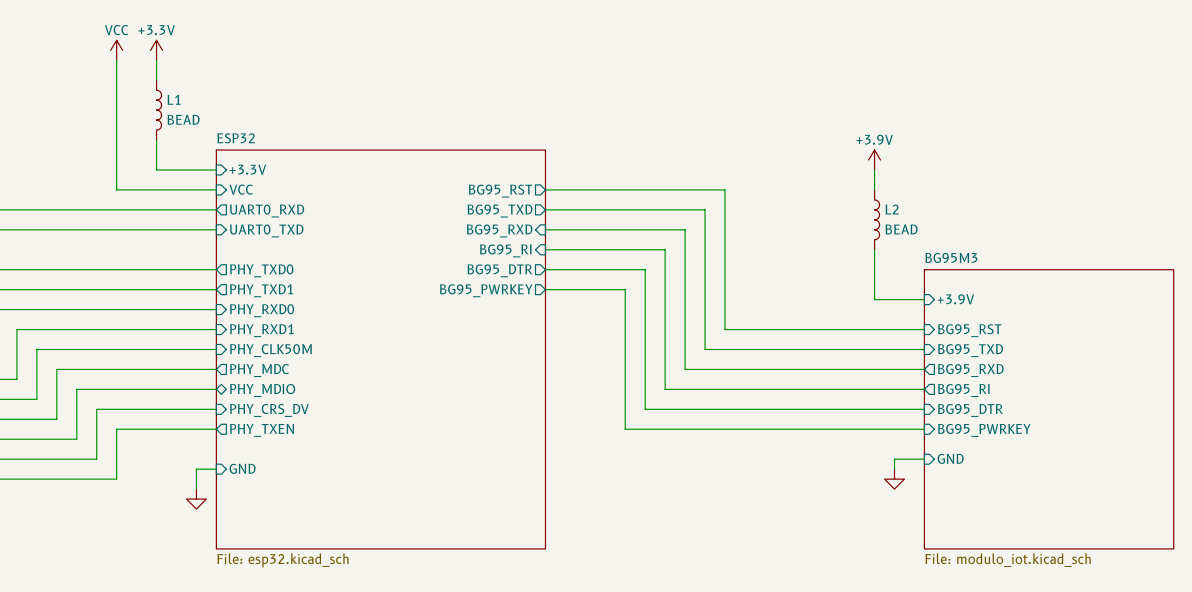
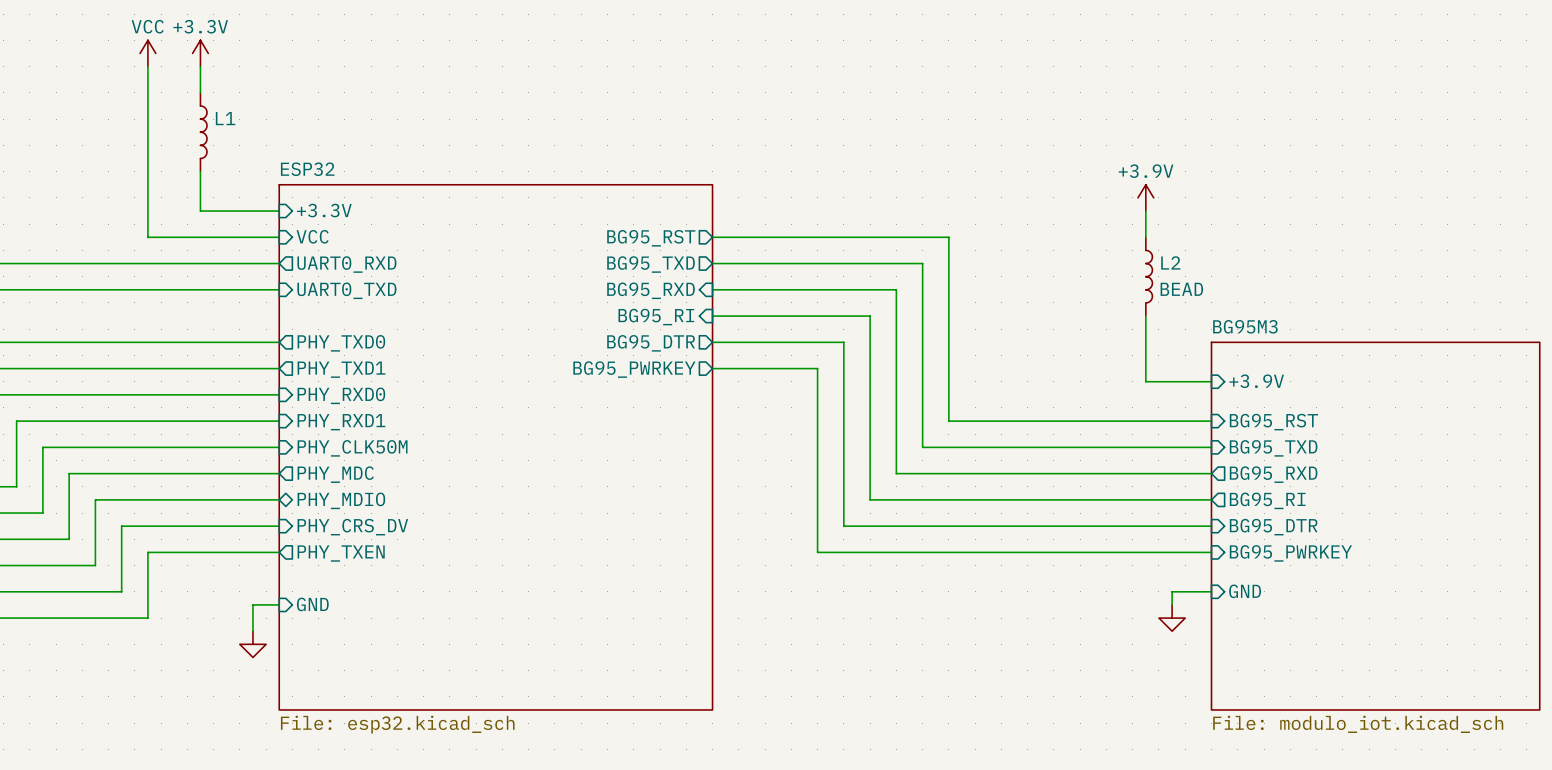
L1 value: BEAD (183, 119) -> none

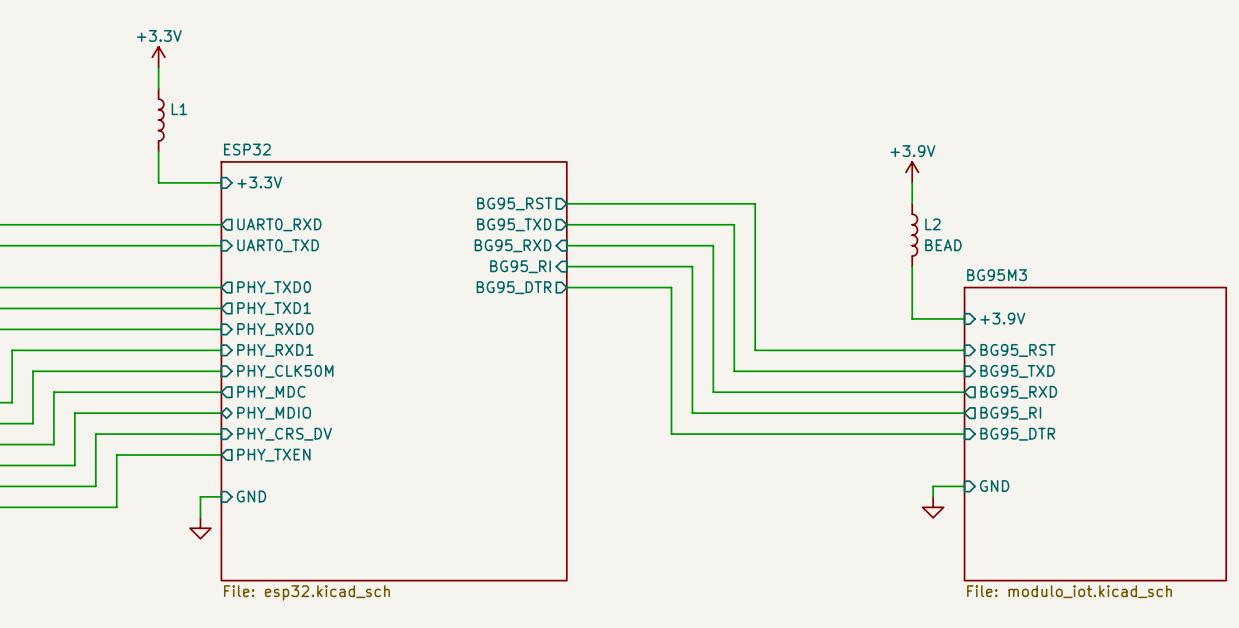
power symbol: VCC (147, 53) -> none
wire: (147, 66) (147, 237) (279, 237) -> none
sheet pin: VCC (312, 236) -> none
wire: (712, 368) (817, 368) (817, 552) (1211, 552) -> none
sheet pin: BG95_PWRKEY (634, 369) -> none
sheet pin: BG95_PWRKEY (1290, 553) -> none

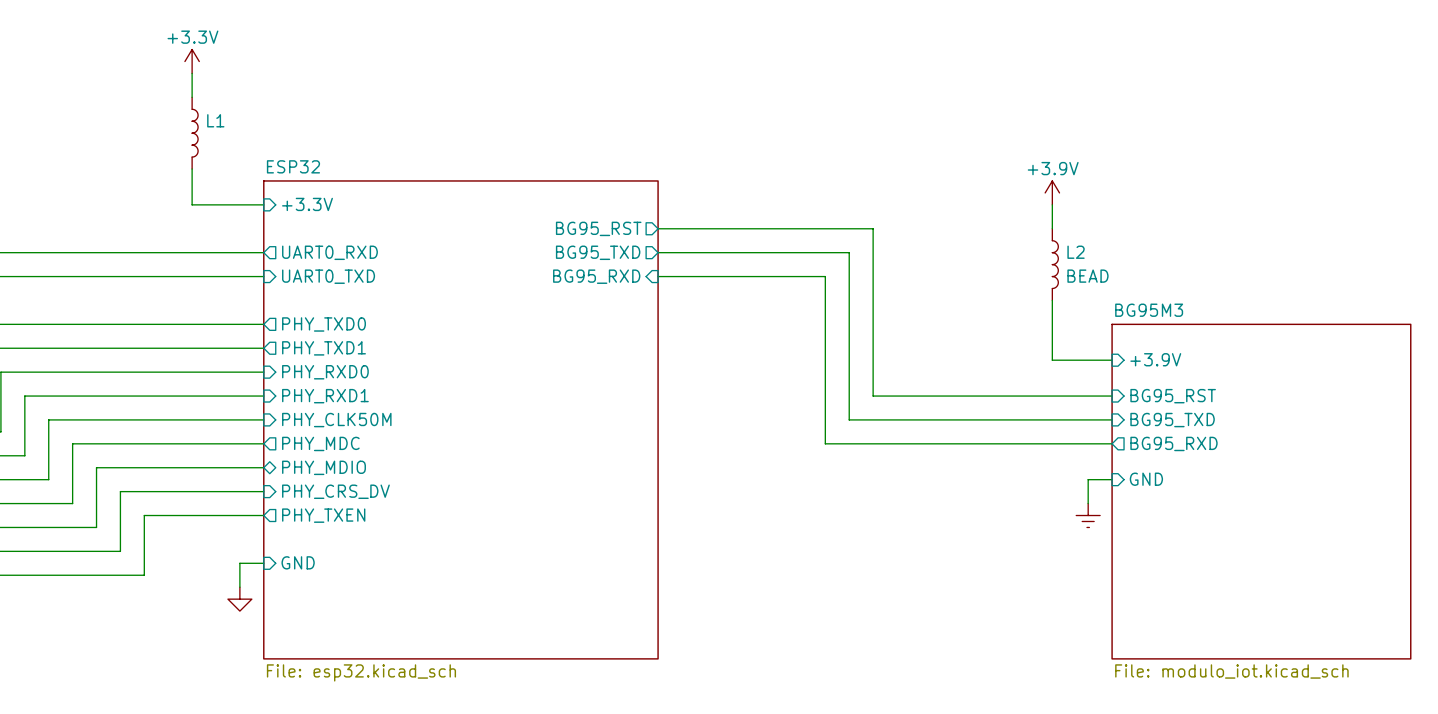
sheet pin: BG95_RI (520, 266) -> none
wire: (566, 266) (692, 266) (692, 413) (964, 413) -> none
sheet pin: BG95_DTR (514, 287) -> none
wire: (566, 287) (671, 287) (671, 434) (964, 434) -> none
sheet pin: BG95_RI (1010, 413) -> none
wire: none -> (1112, 479) (1088, 479) (1088, 503)
sheet pin: BG95_DTR (1017, 434) -> none
power symbol: none -> (1088, 515)
wire: (964, 486) (933, 486) (933, 496) -> none
sheet pin position: GND (994, 486) -> GND (1146, 479)
power symbol: (933, 507) -> none

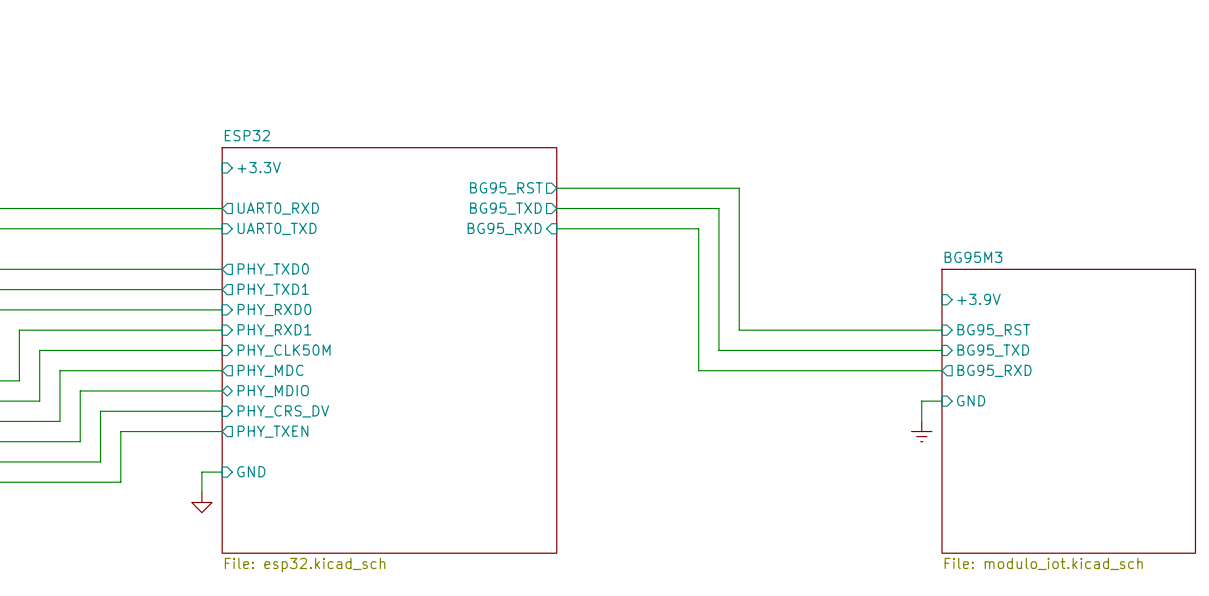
power symbol: +3.3V (192, 61) -> none
wire: (192, 73) (192, 97) -> none
L1: (195, 133) -> none
wire: (192, 169) (192, 204) (263, 204) -> none
power symbol: +3.9V (1052, 192) -> none
wire: (1052, 204) (1052, 228) -> none
L2: BEAD (1055, 264) -> none
wire: (1052, 300) (1052, 360) (1112, 360) -> none

